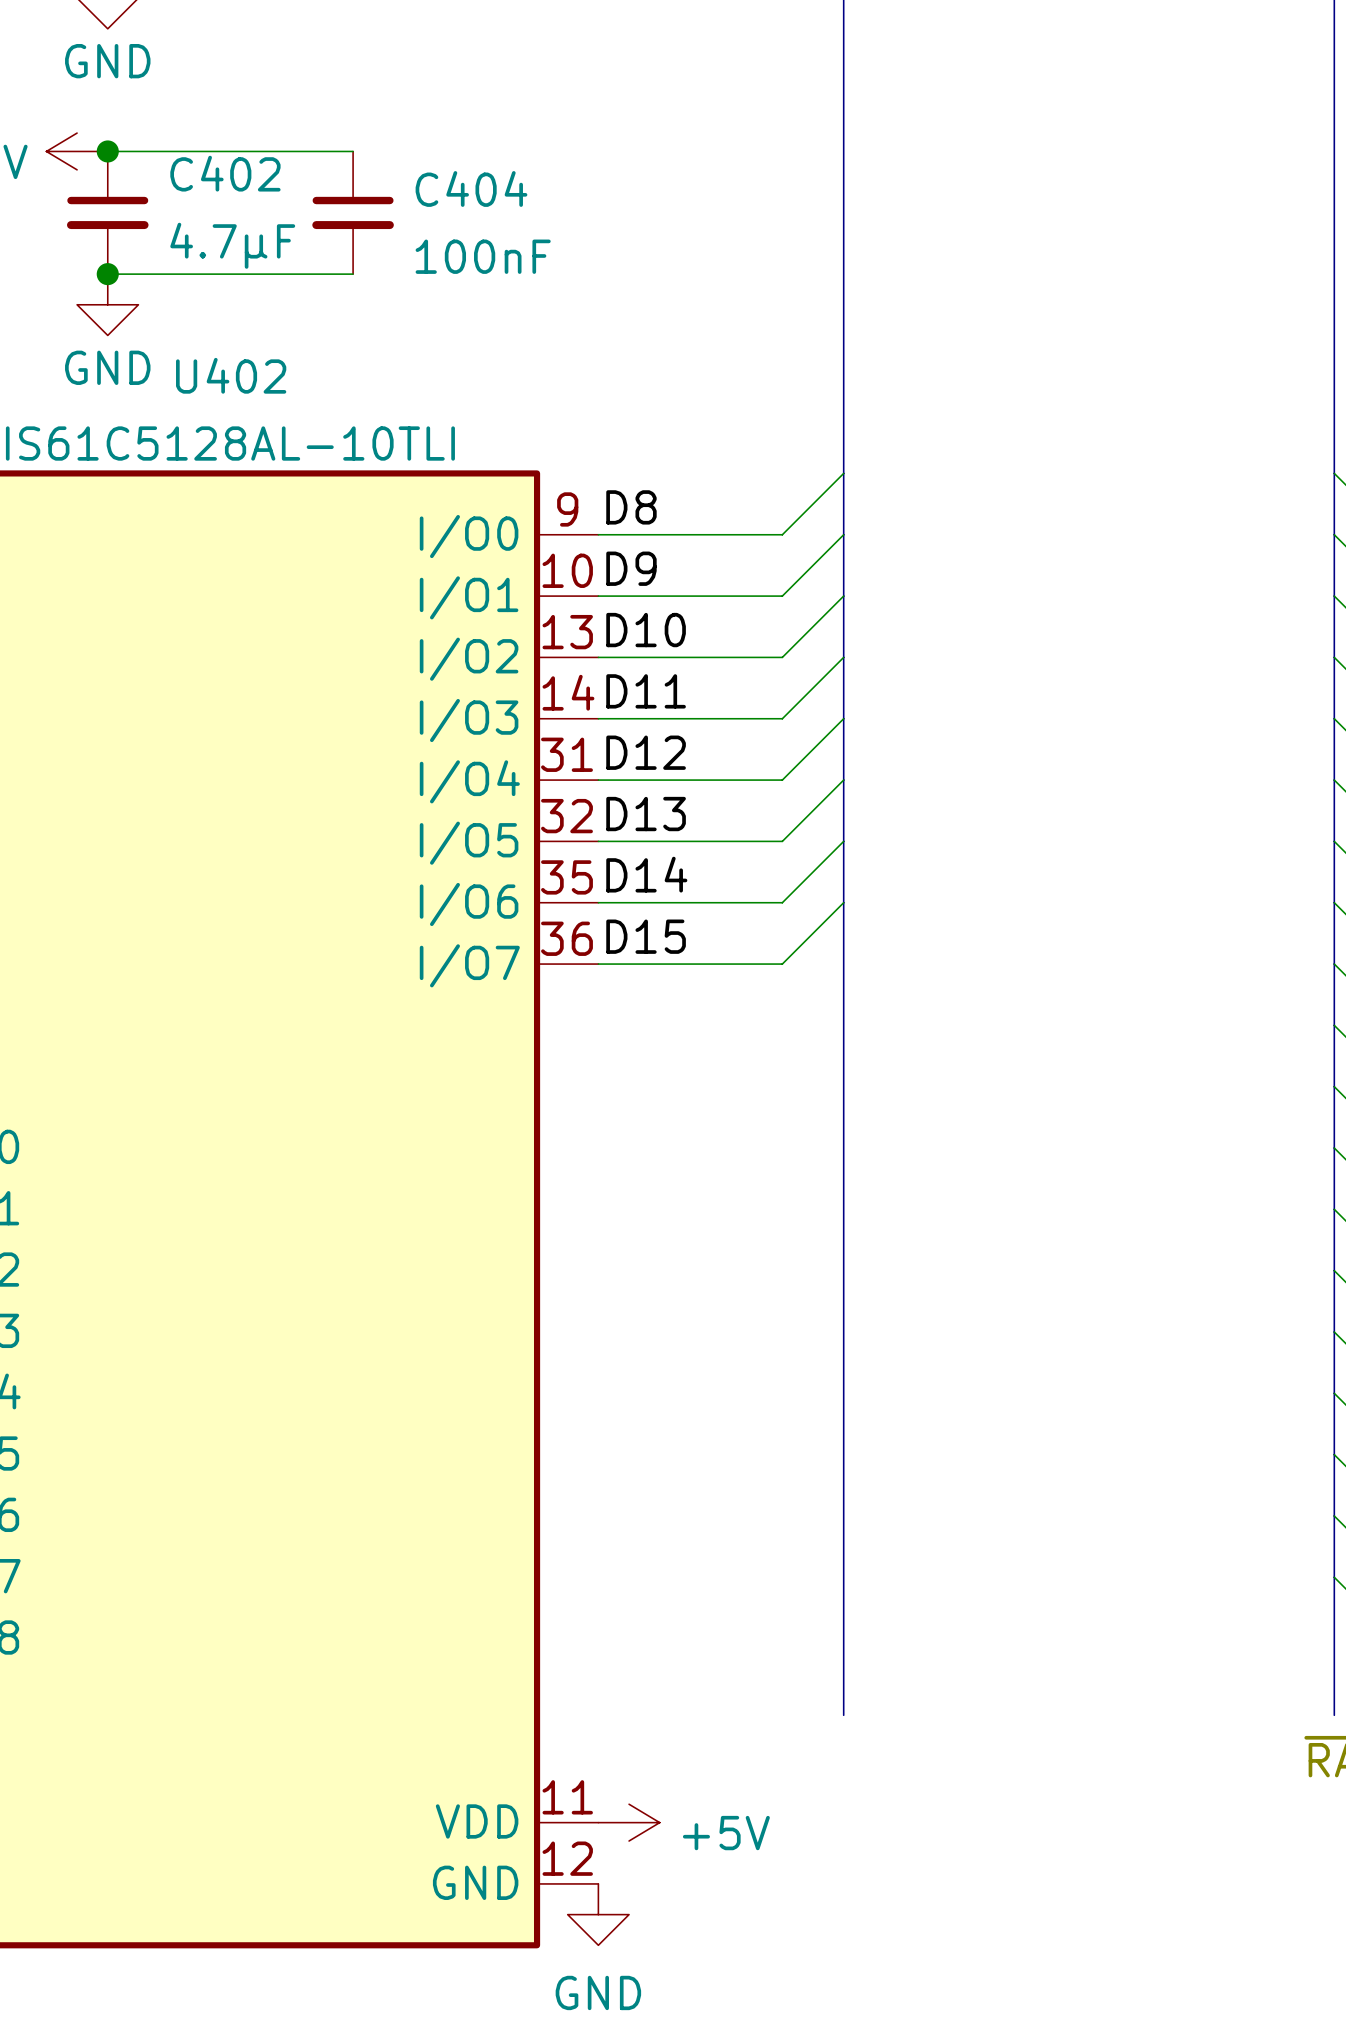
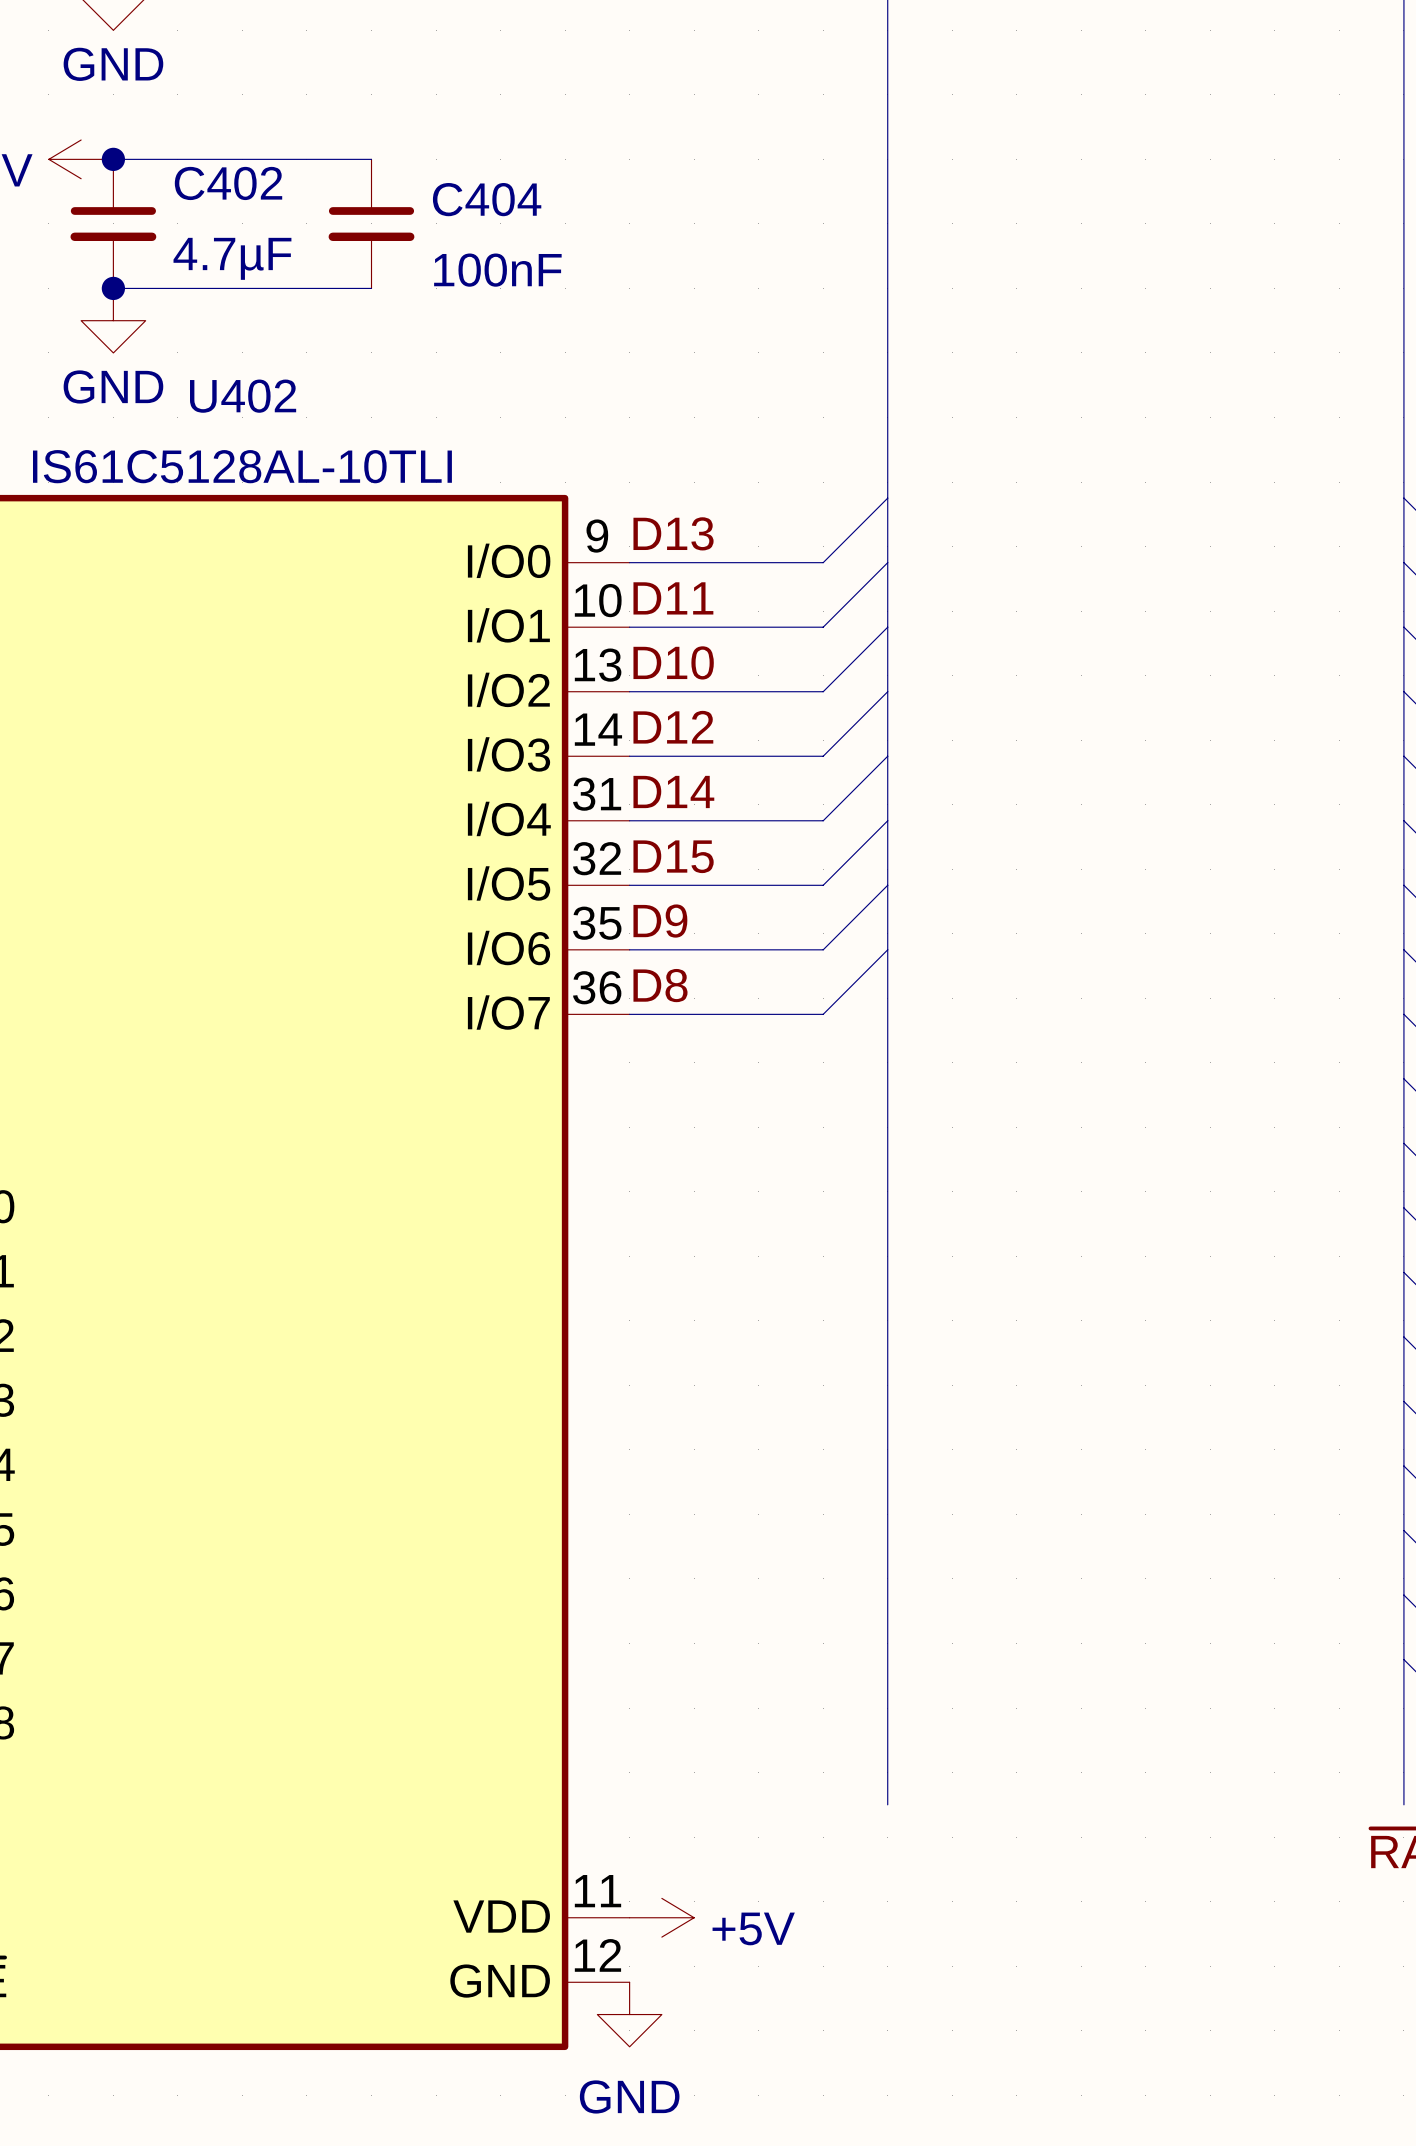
label: D8 (631, 507) -> D13 (673, 533)
label: D9 (631, 568) -> D11 (673, 598)
label: D11 (646, 691) -> D12 (673, 727)
label: D12 (646, 752) -> D14 (673, 791)
label: D13 (646, 814) -> D15 (673, 856)
label: D14 (646, 874) -> D9 (660, 921)
label: D15 (646, 936) -> D8 (660, 985)

